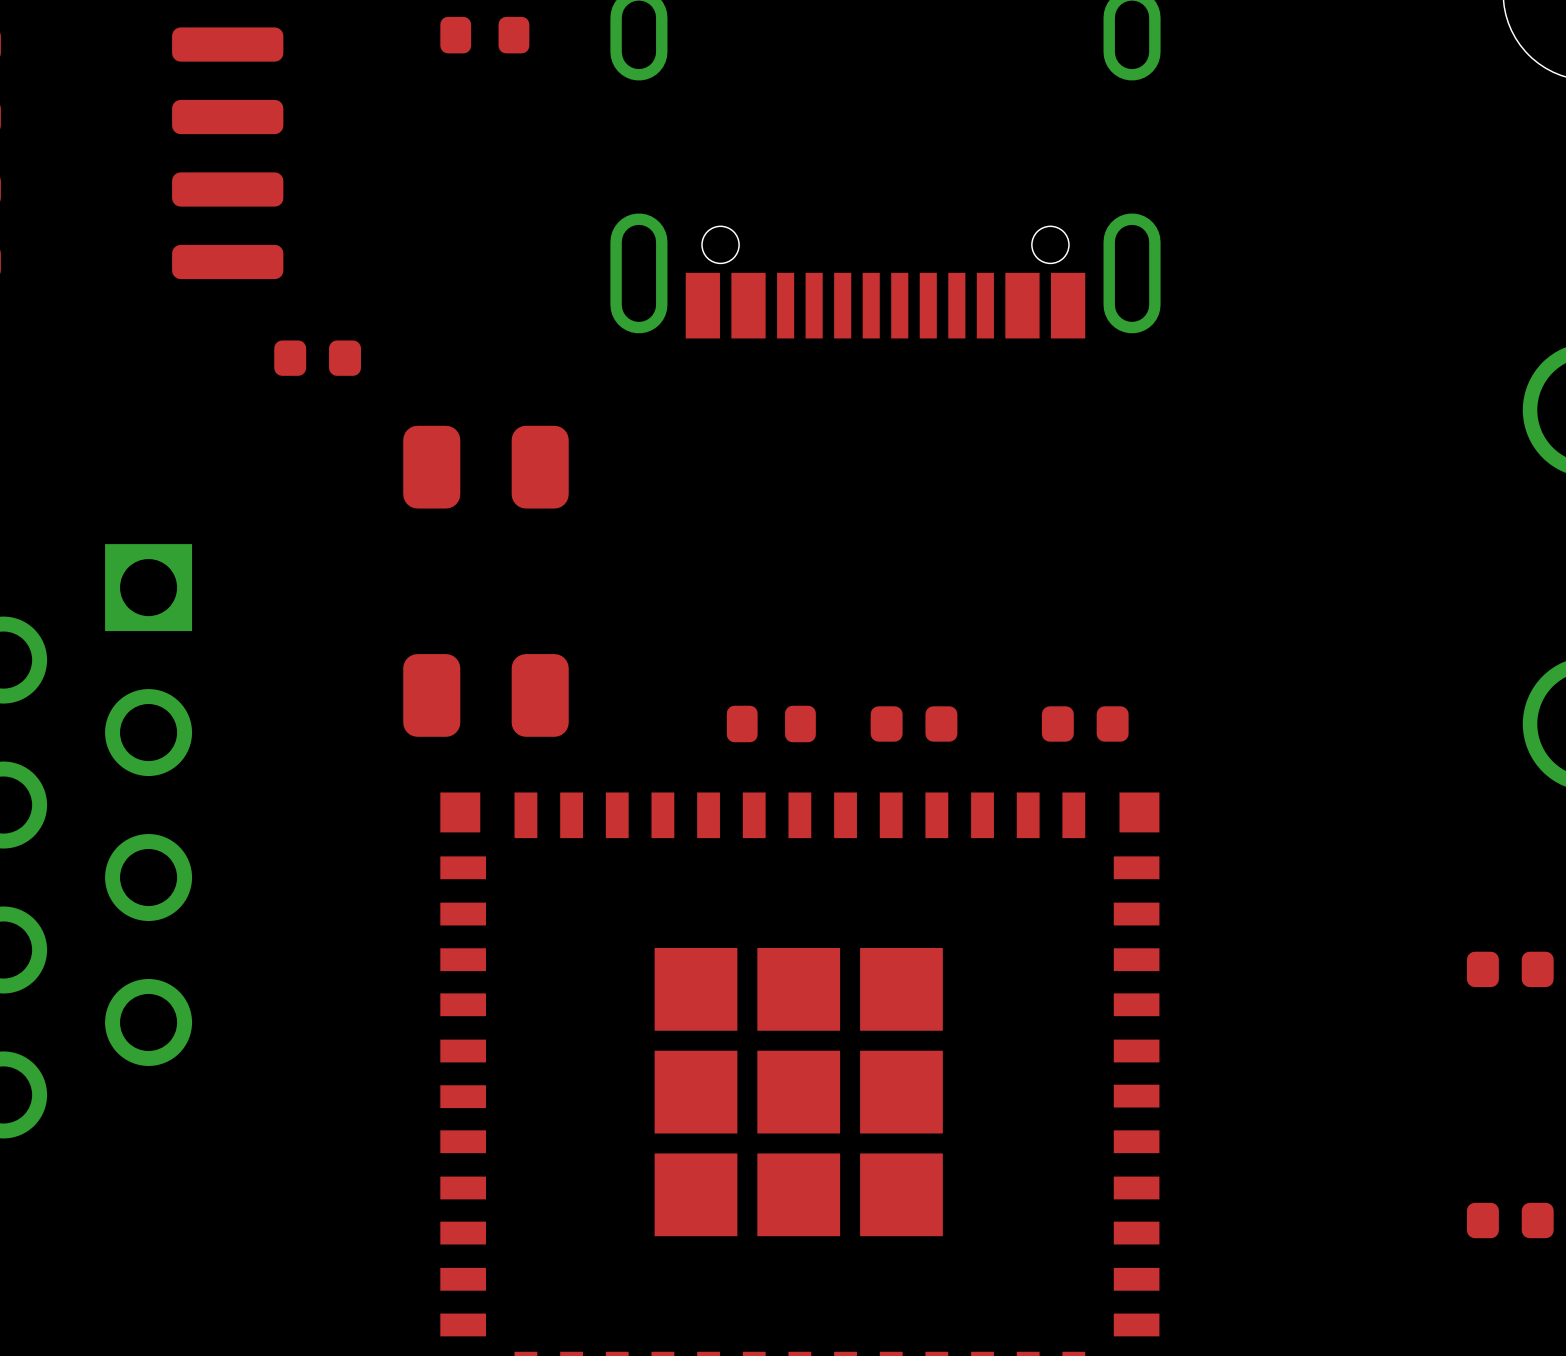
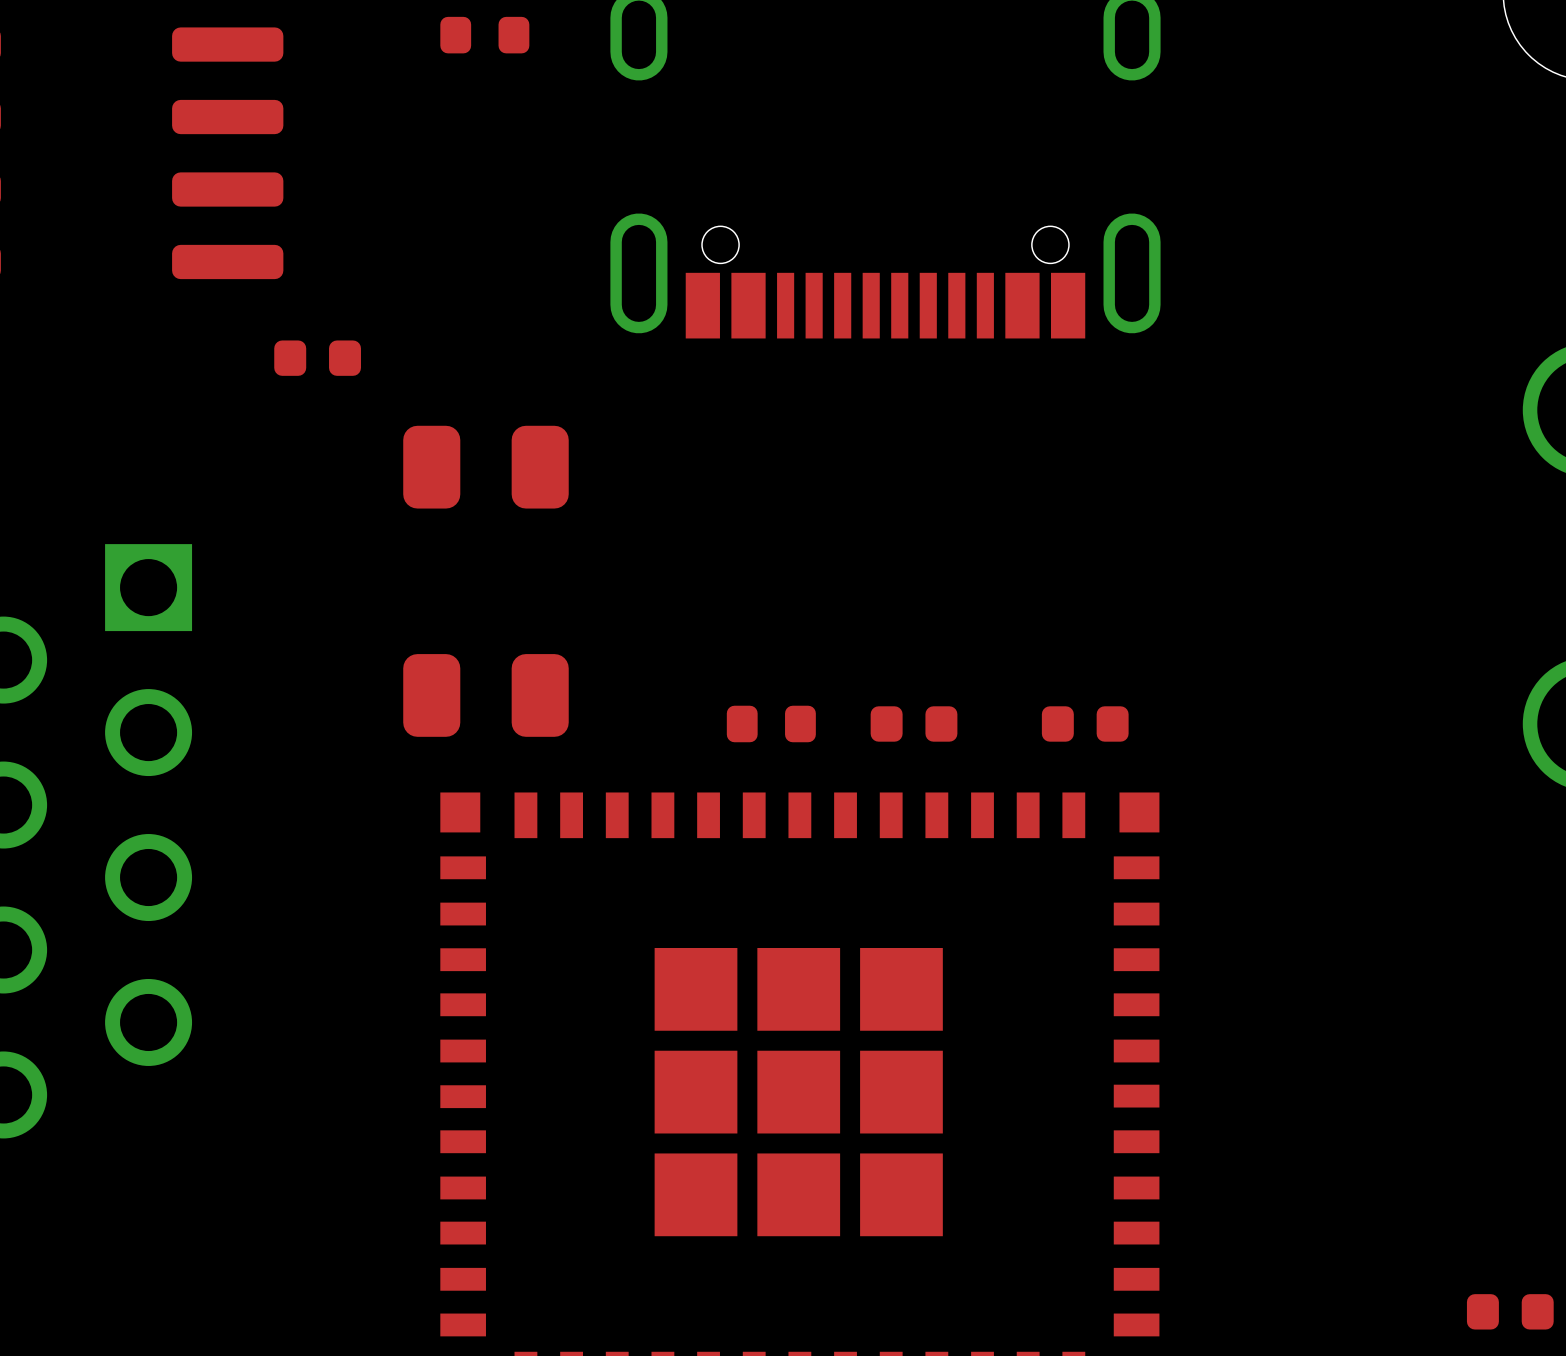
part: (1510, 969) -> none
part position: (1510, 1220) -> (1510, 1311)

